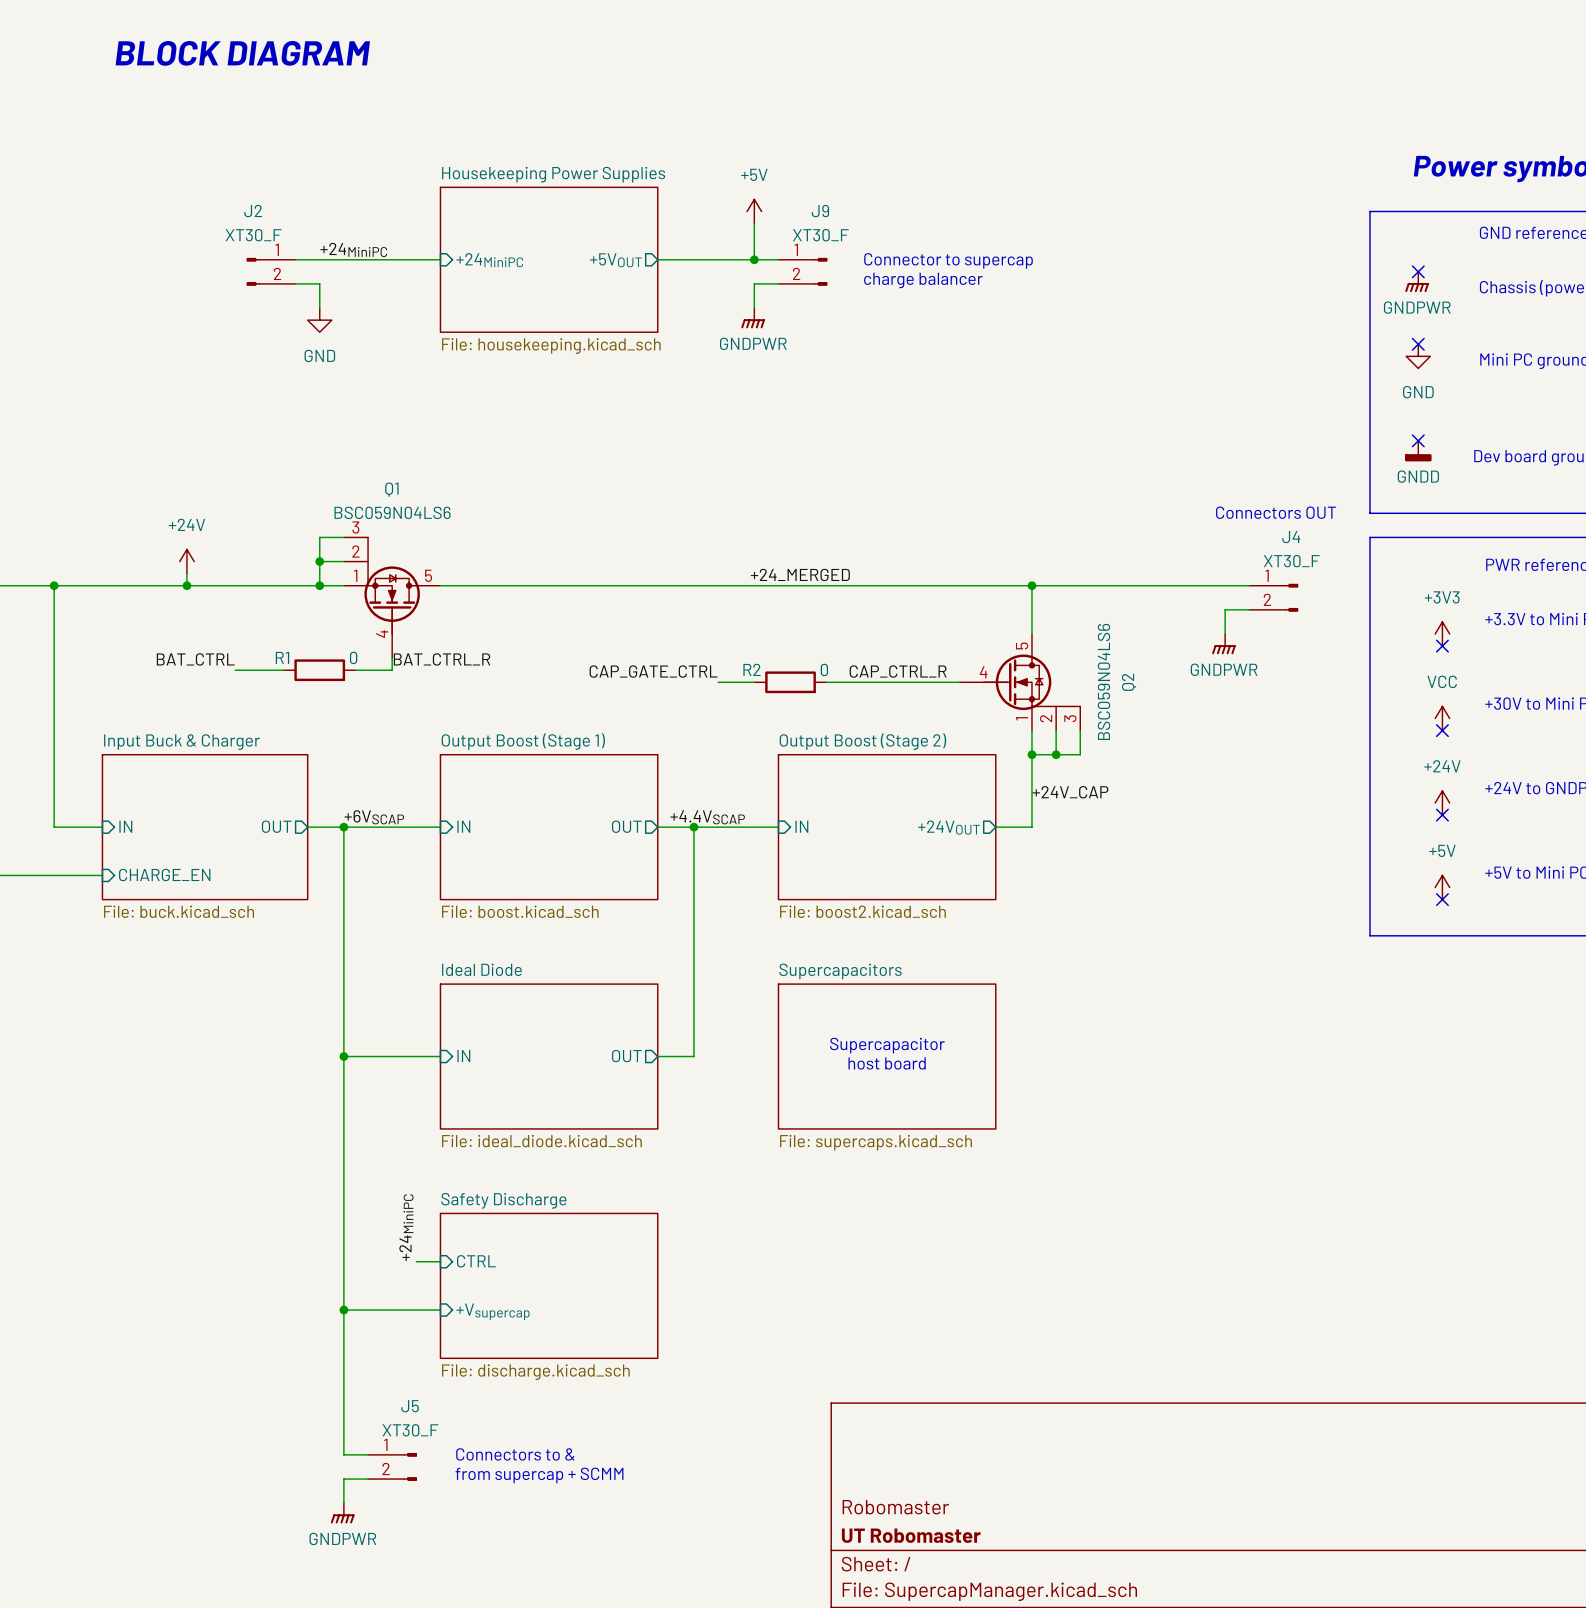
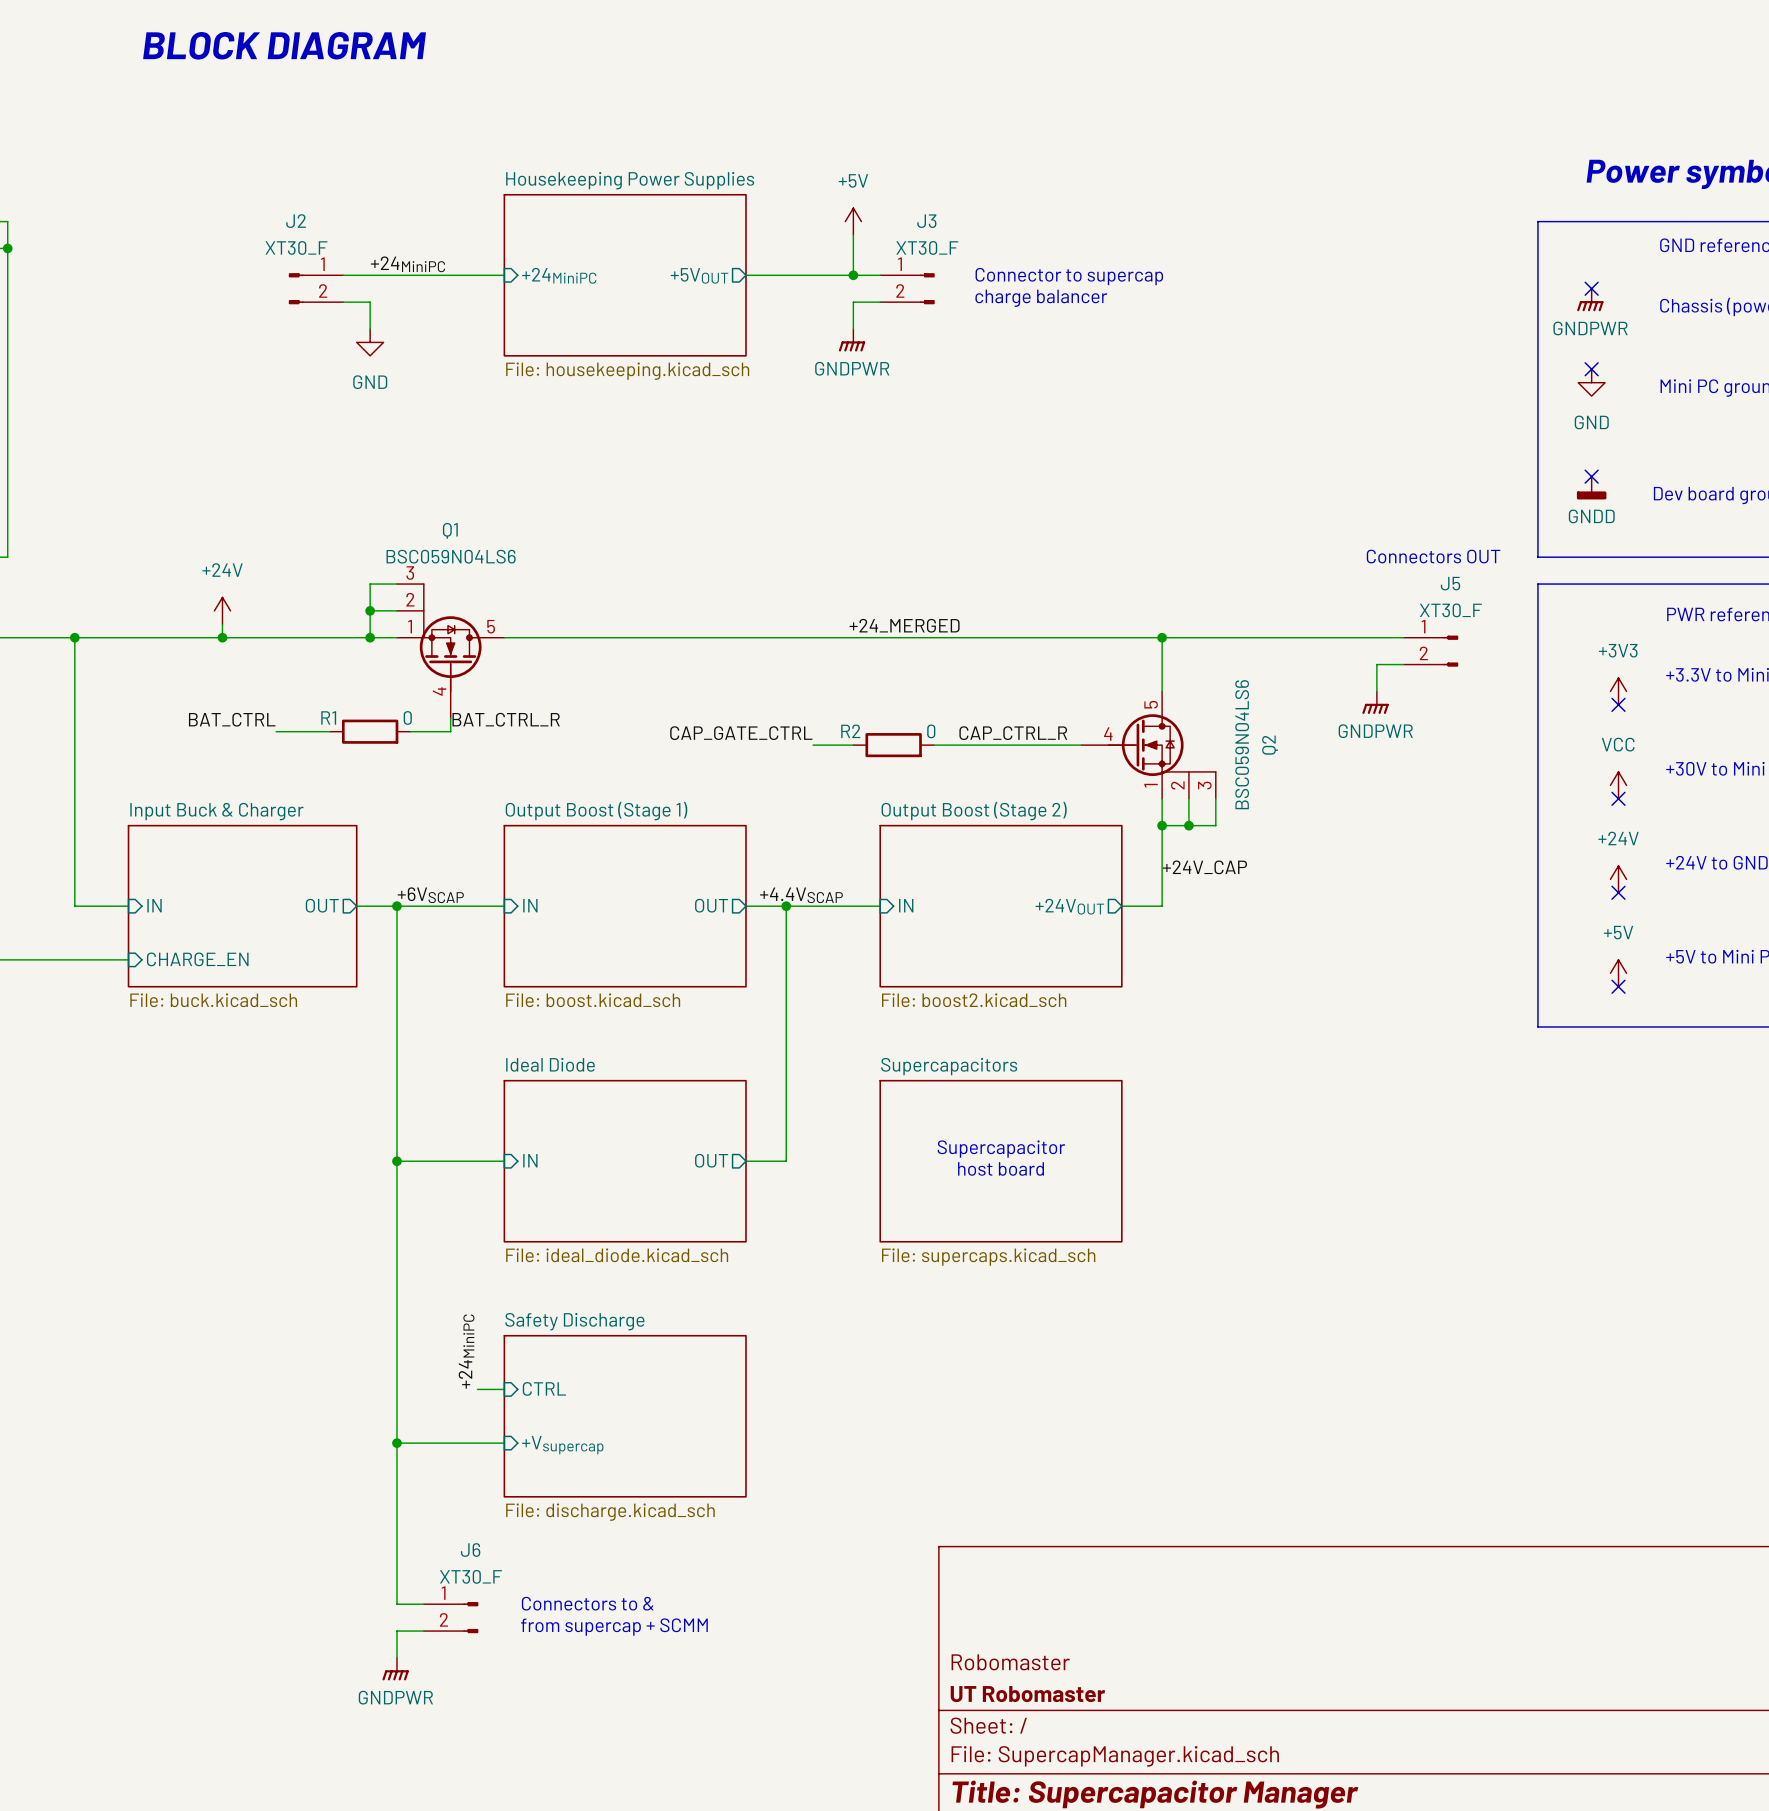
J9 name: J9 (820, 211) -> J3 (926, 221)
J4 name: J4 (1291, 537) -> J5 (1450, 583)
J5 name: J5 (410, 1406) -> J6 (470, 1550)

